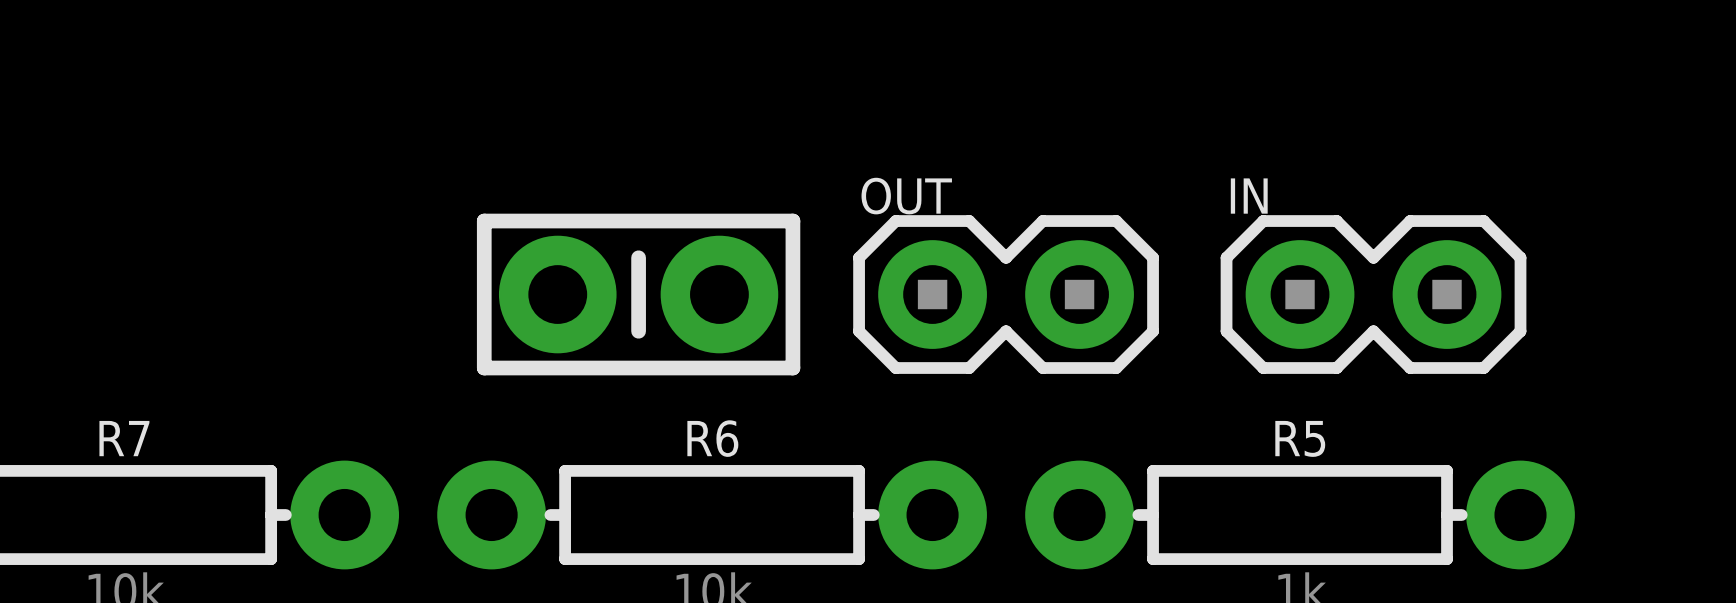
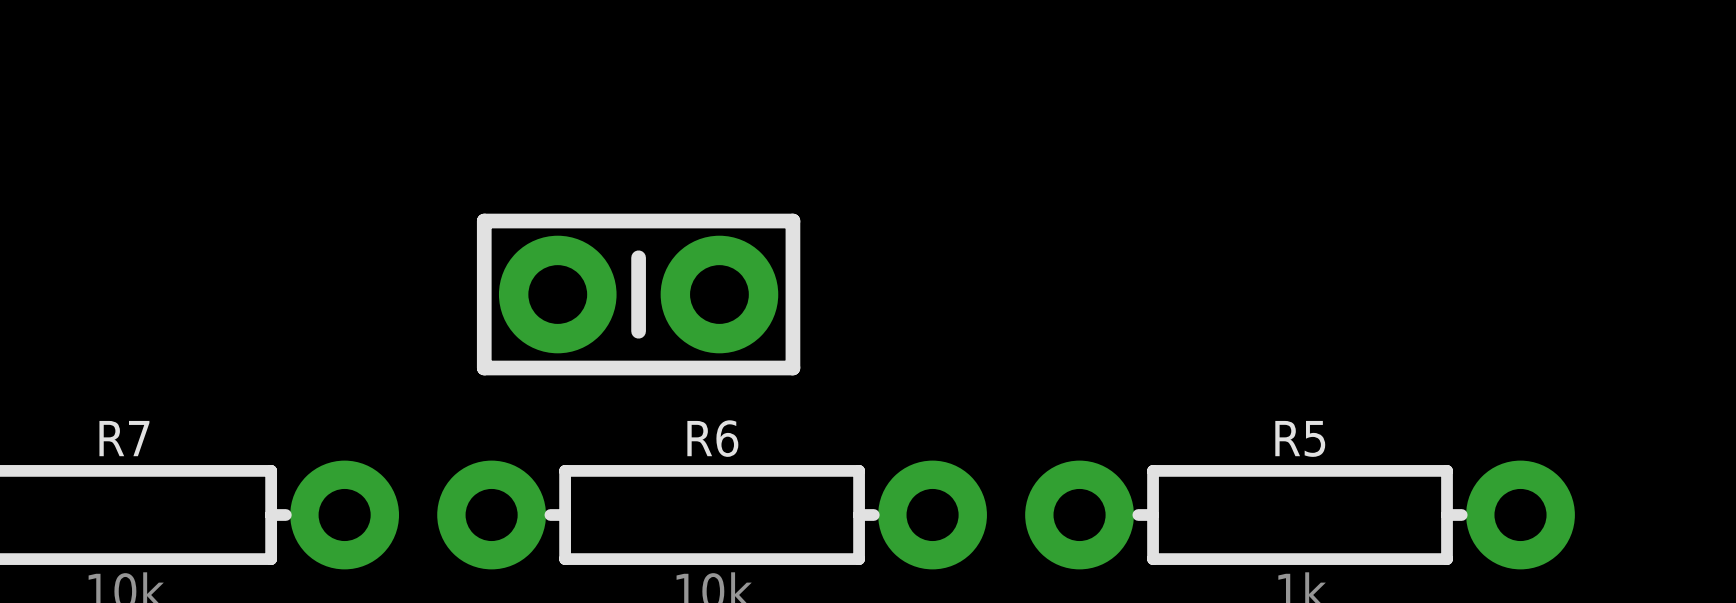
OUT: (1006, 294) -> none
IN: (1373, 294) -> none

